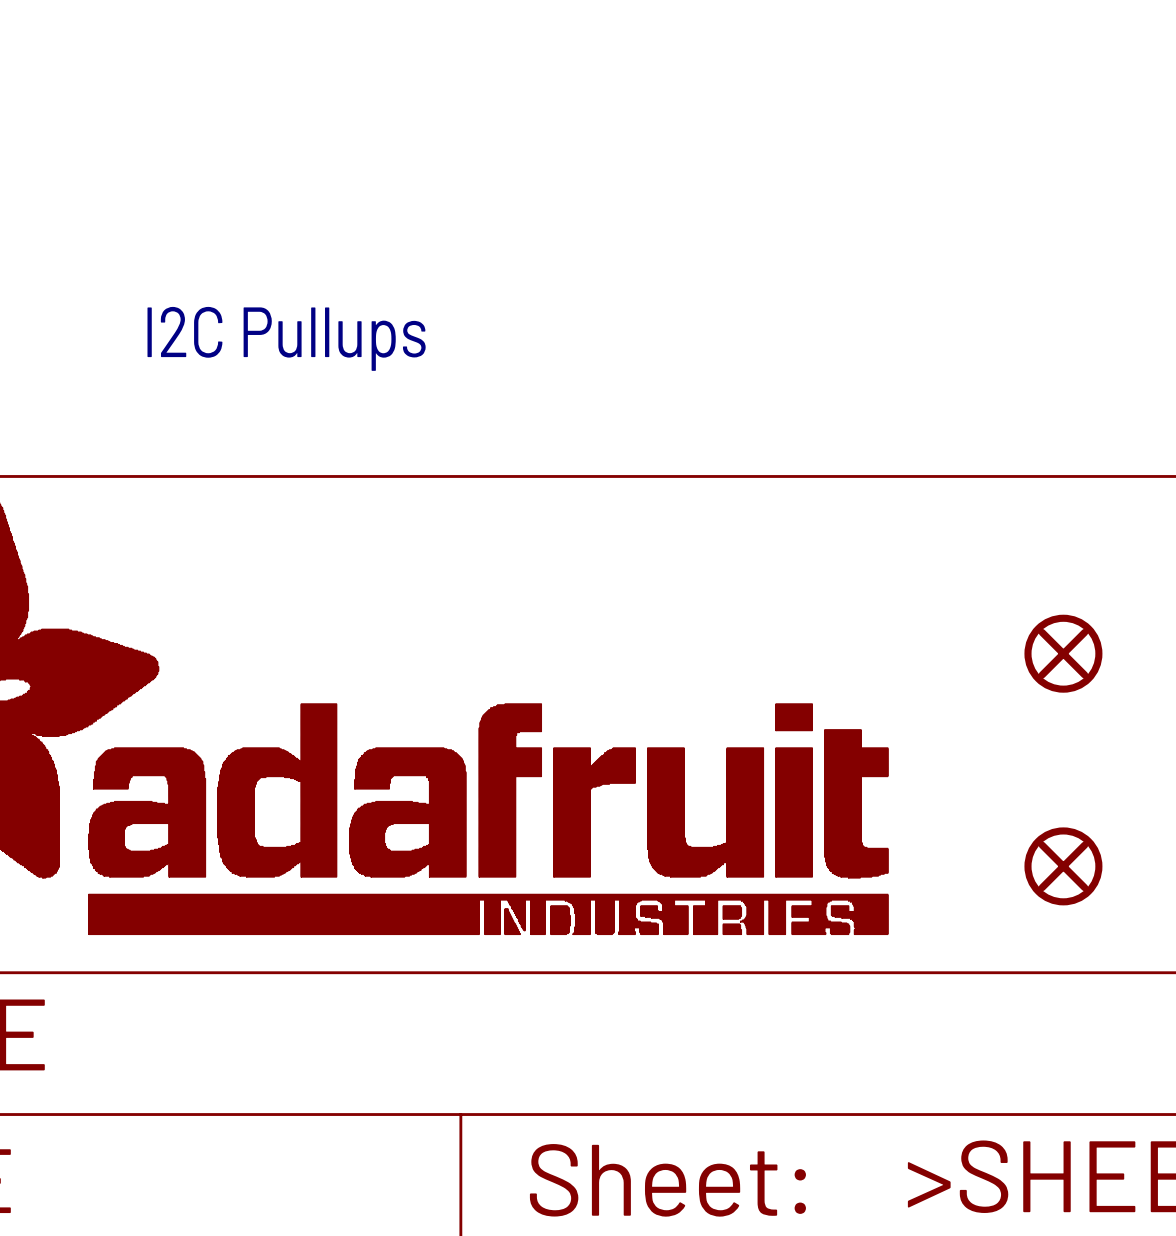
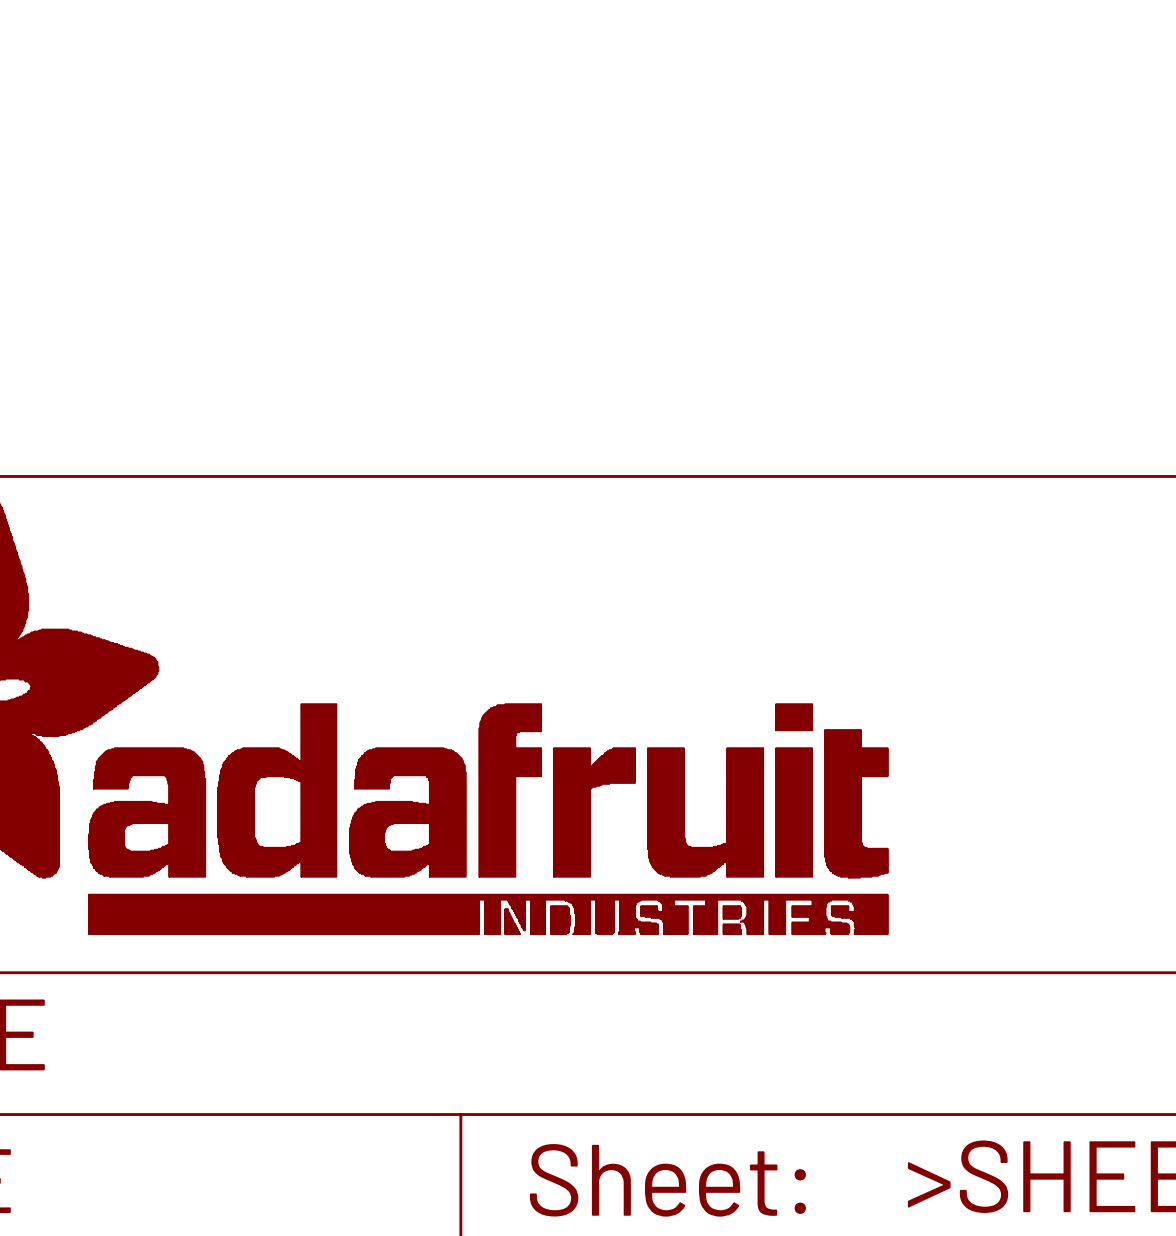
text: I2C Pullups (286, 338) -> none
part: (1063, 653) -> none
part: (1063, 866) -> none

